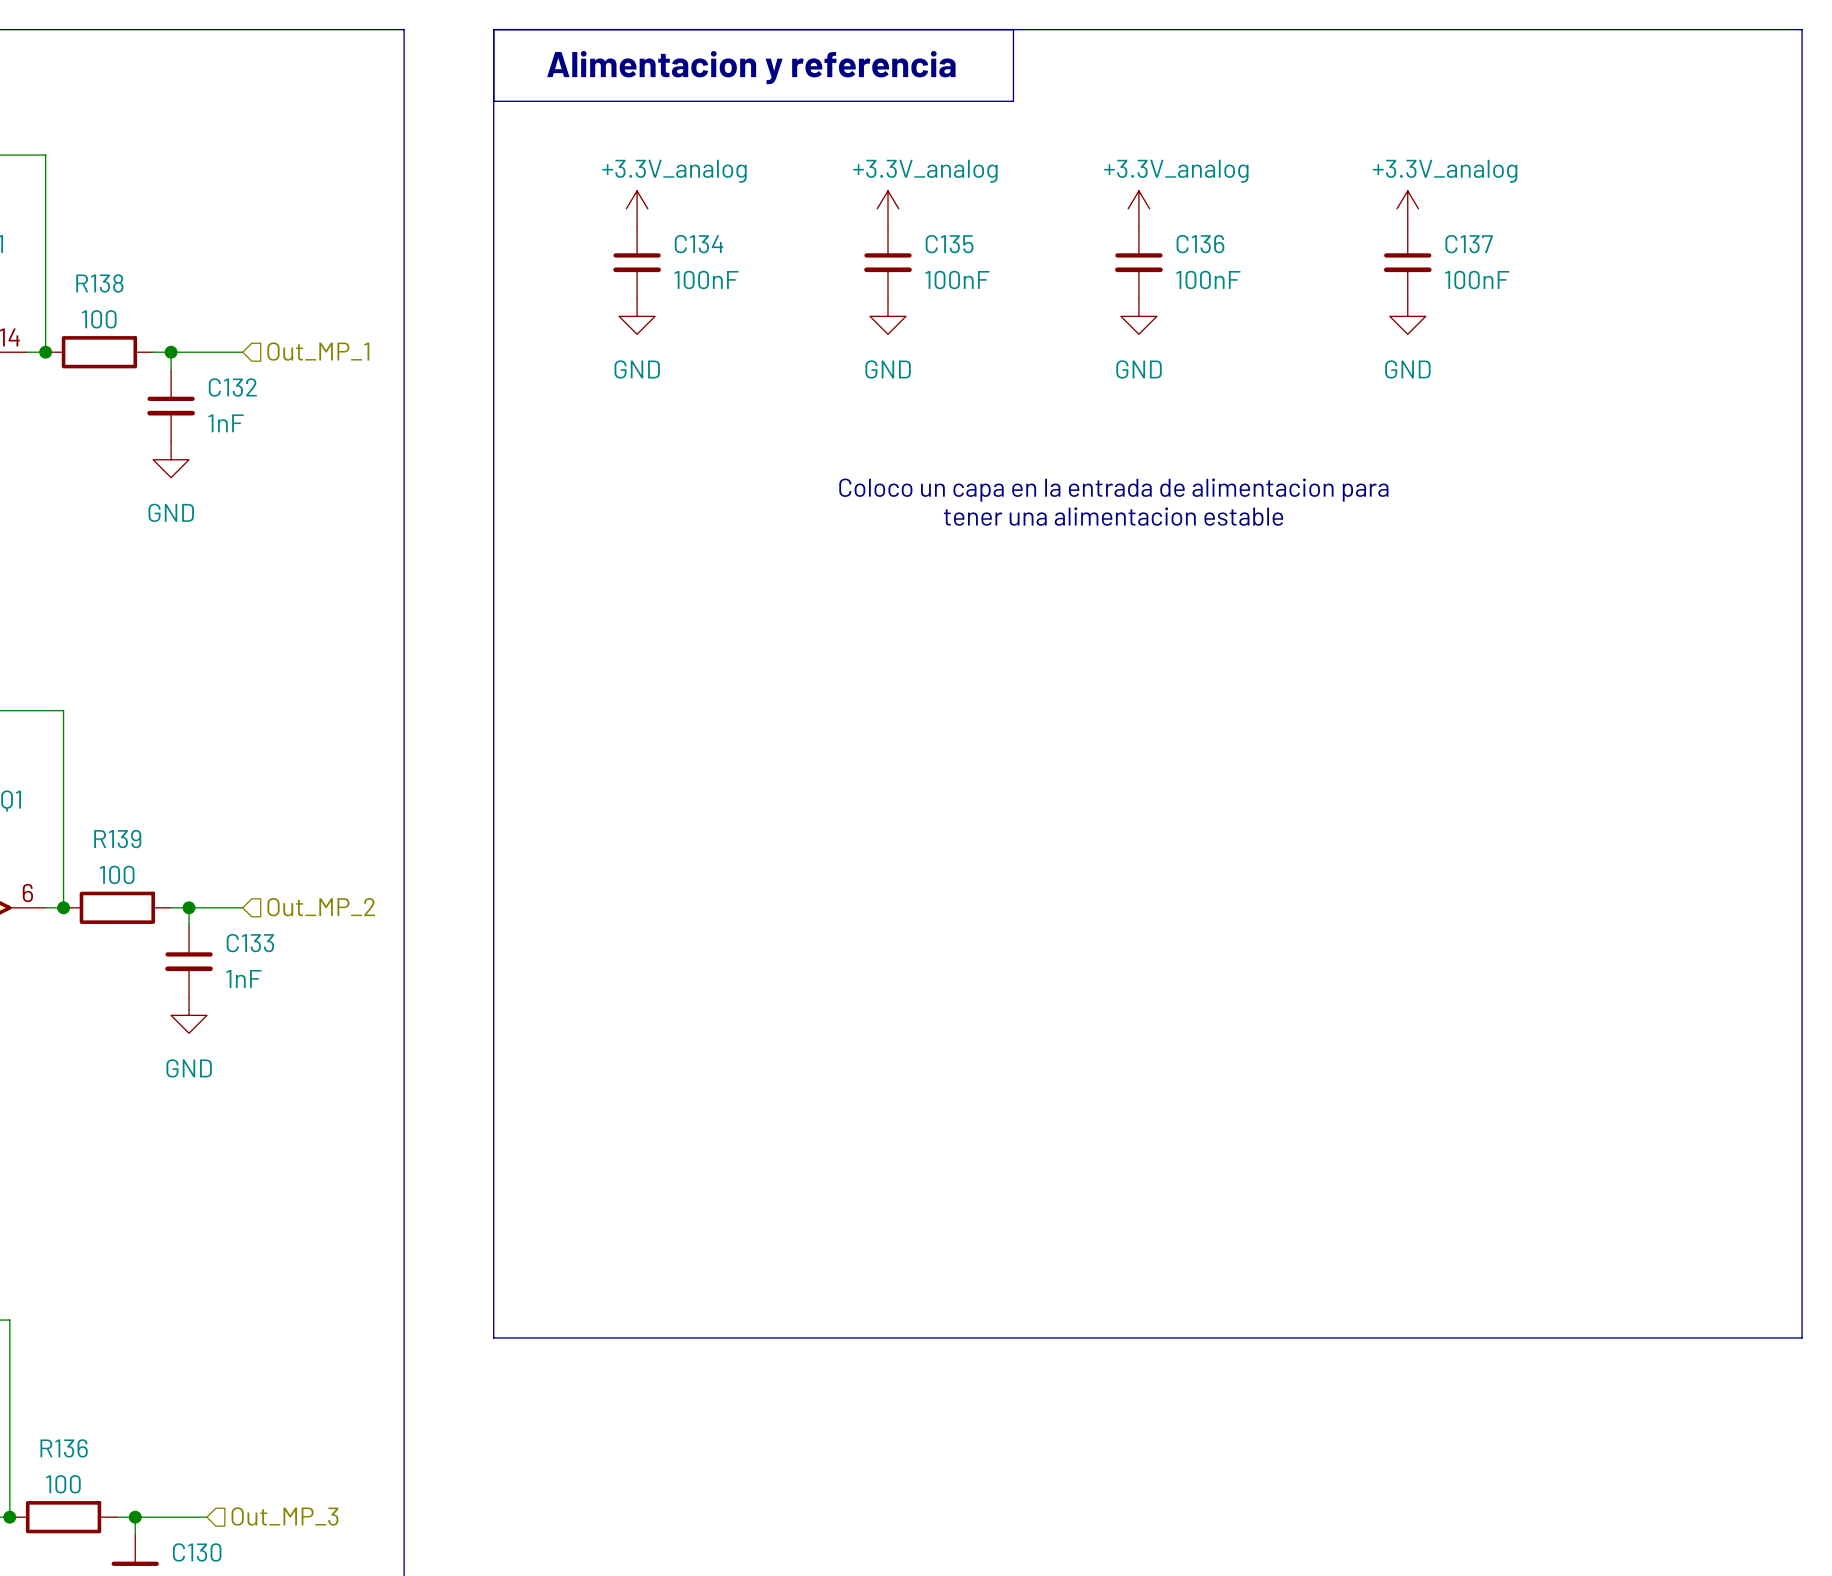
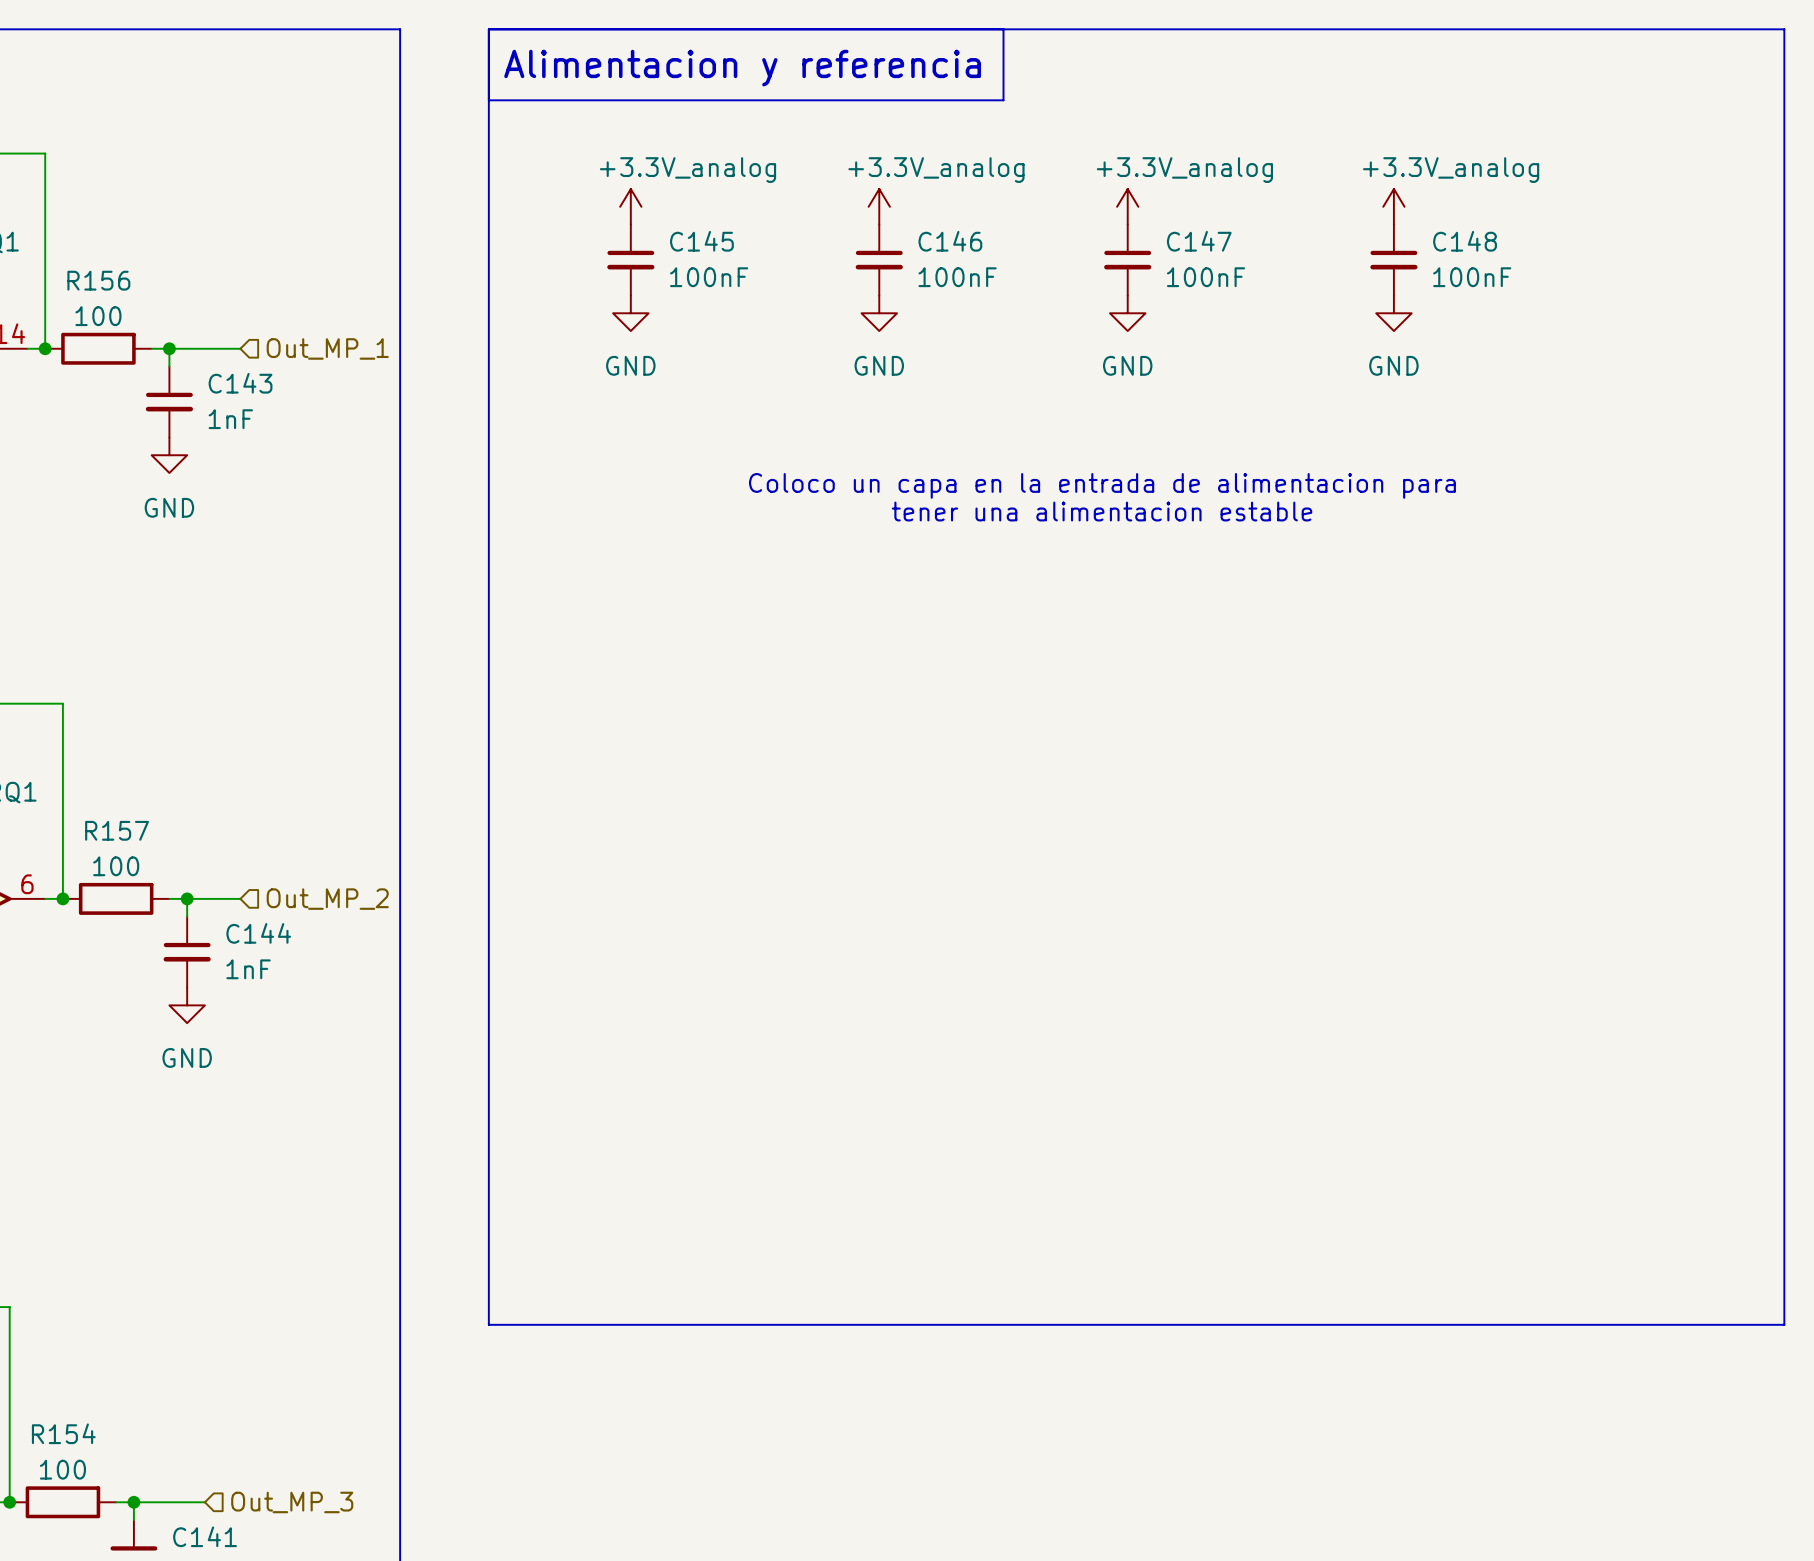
C134 name: C134 (698, 244) -> C145 (701, 241)
C135 name: C135 (949, 244) -> C146 (950, 241)
C136 name: C136 (1200, 244) -> C147 (1199, 241)
C137 name: C137 (1469, 244) -> C148 (1465, 241)
R138 name: R138 (99, 283) -> R156 (98, 280)
C132 name: C132 (232, 387) -> C143 (240, 383)
R139 name: R139 (117, 839) -> R157 (117, 830)
C133 name: C133 (250, 943) -> C144 (258, 933)
R136 name: R136 (64, 1448) -> R154 (63, 1433)
C130 name: C130 (197, 1552) -> C141 (205, 1536)

